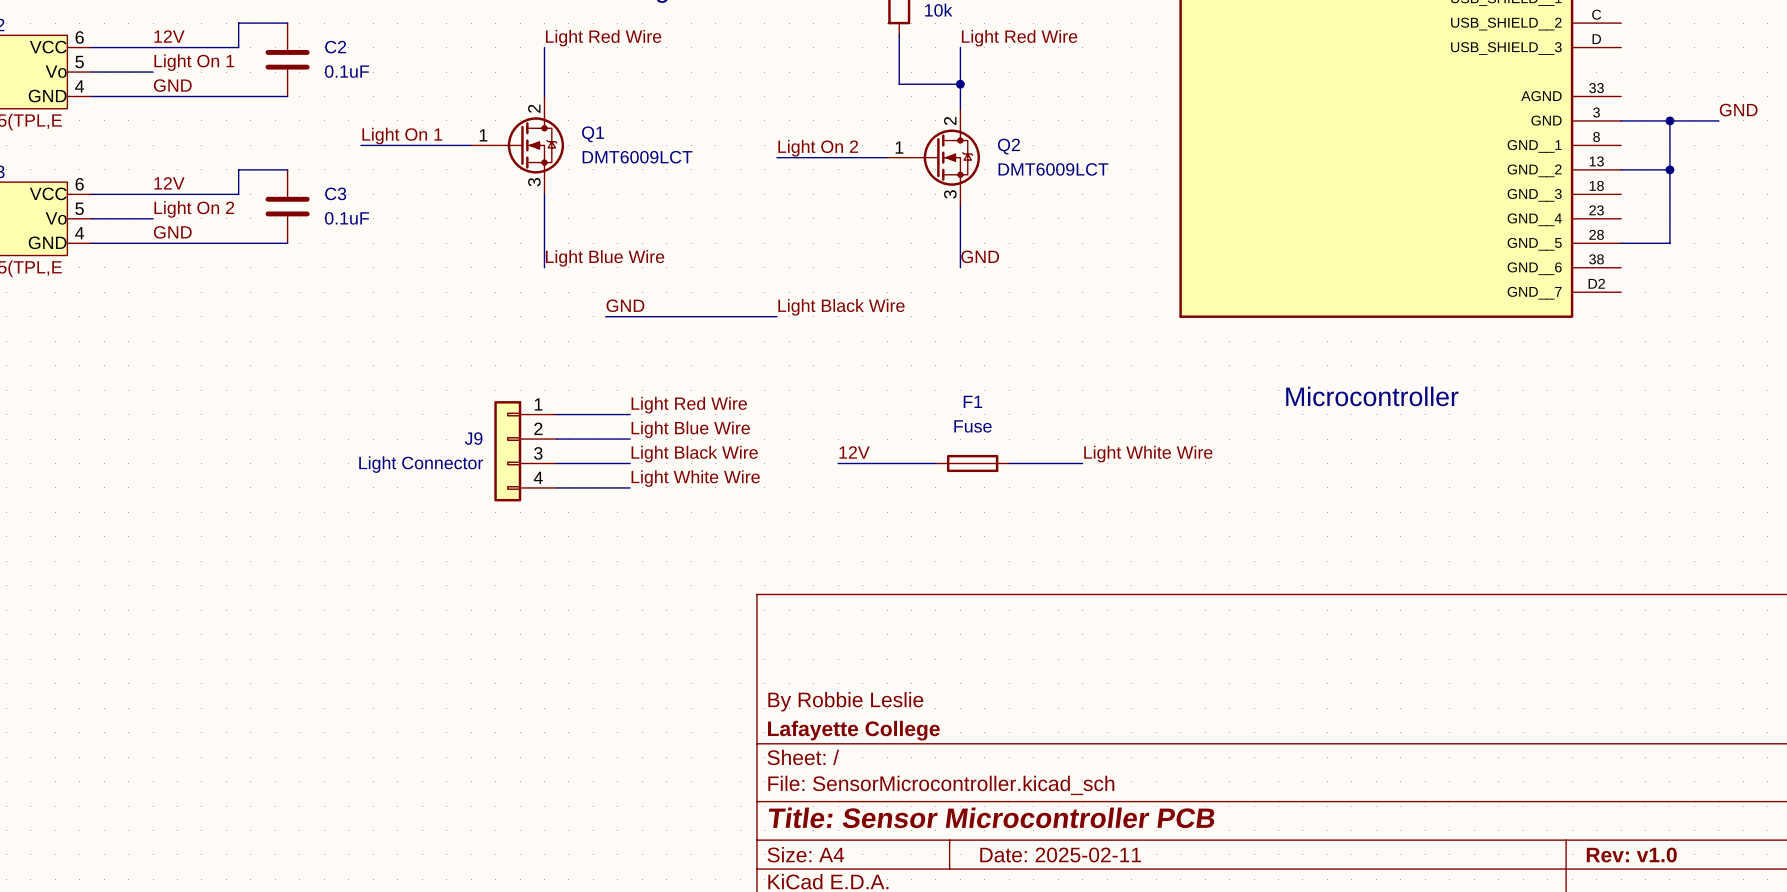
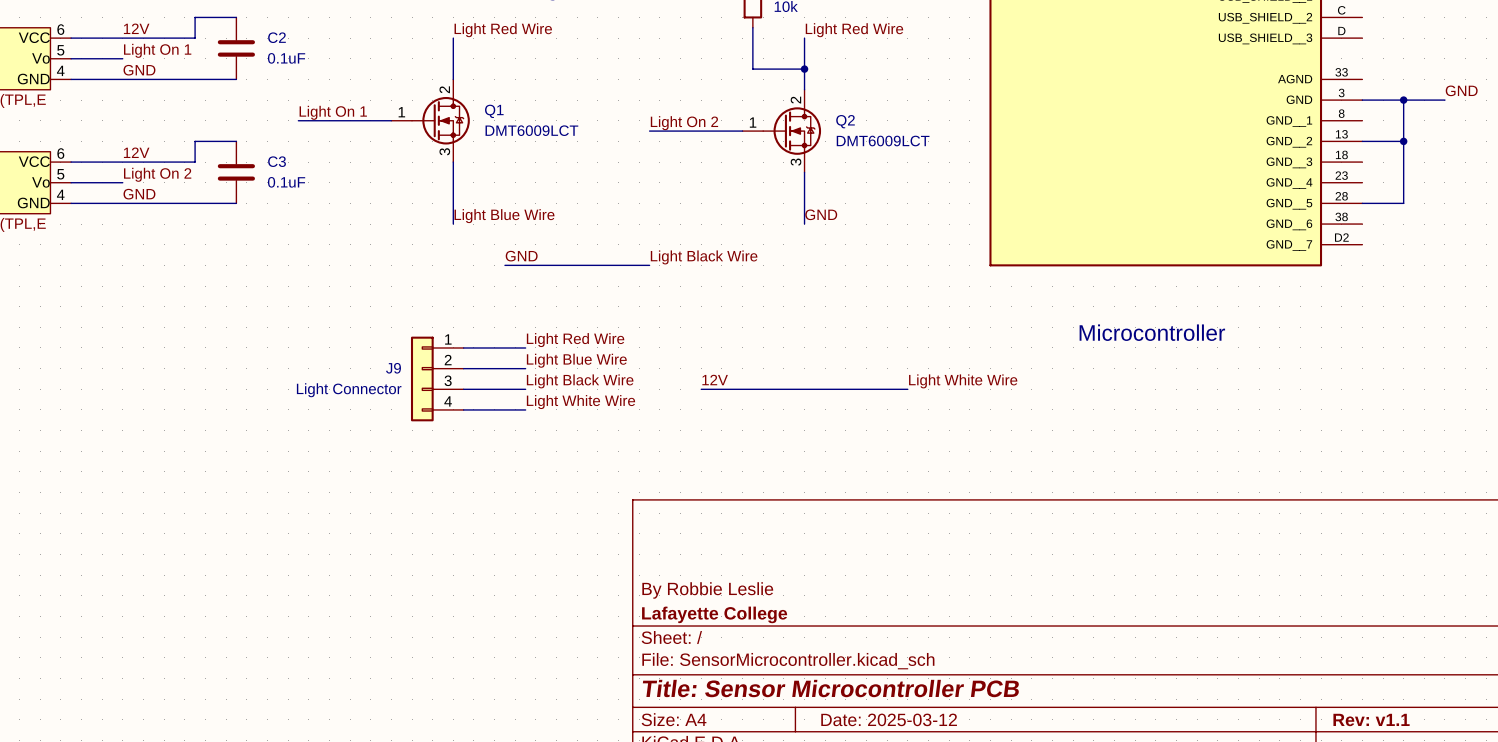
F1: Fuse (972, 463) -> none
title block: Date: 2025-02-11 (1060, 854) -> Date: 2025-03-12 (889, 719)
title block: Rev: v1.0 (1631, 854) -> Rev: v1.1 (1371, 719)

